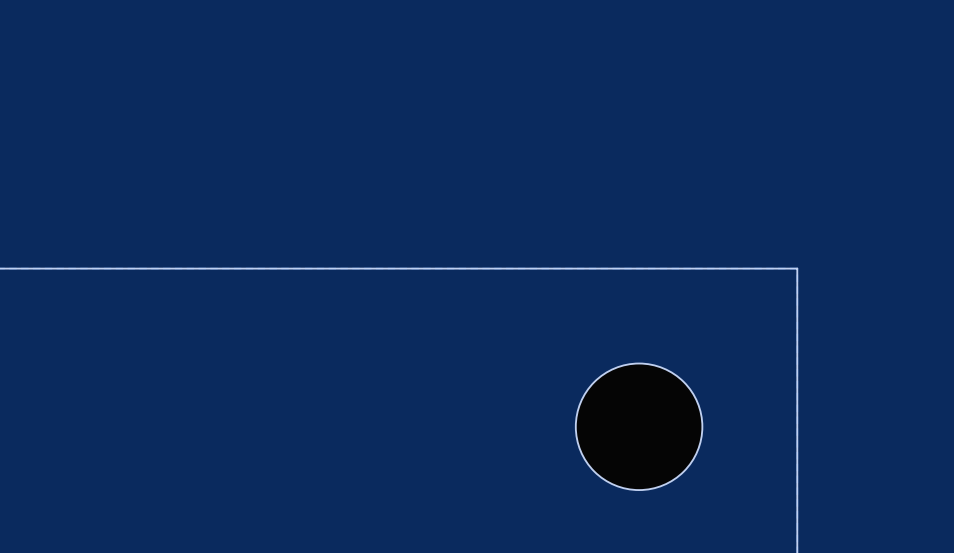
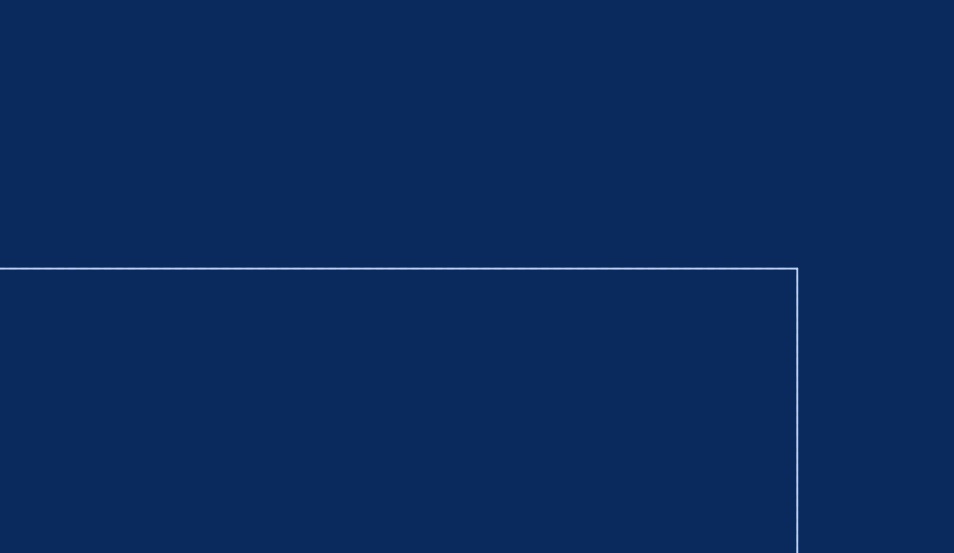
part: (639, 426) -> none

